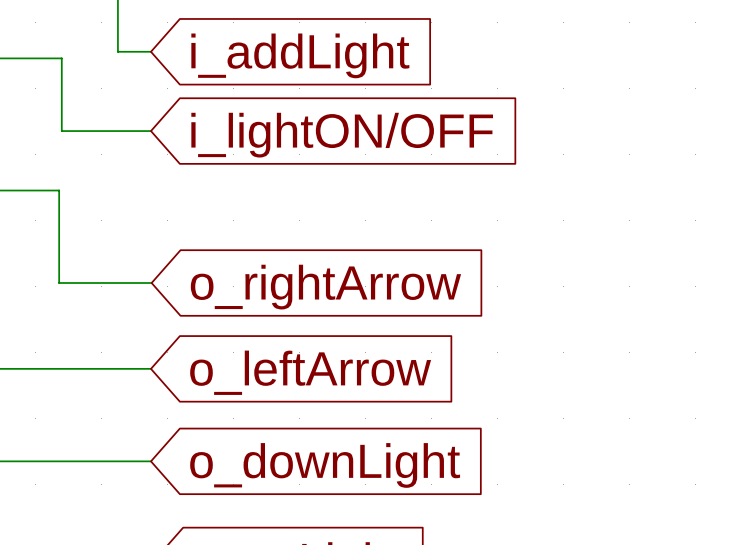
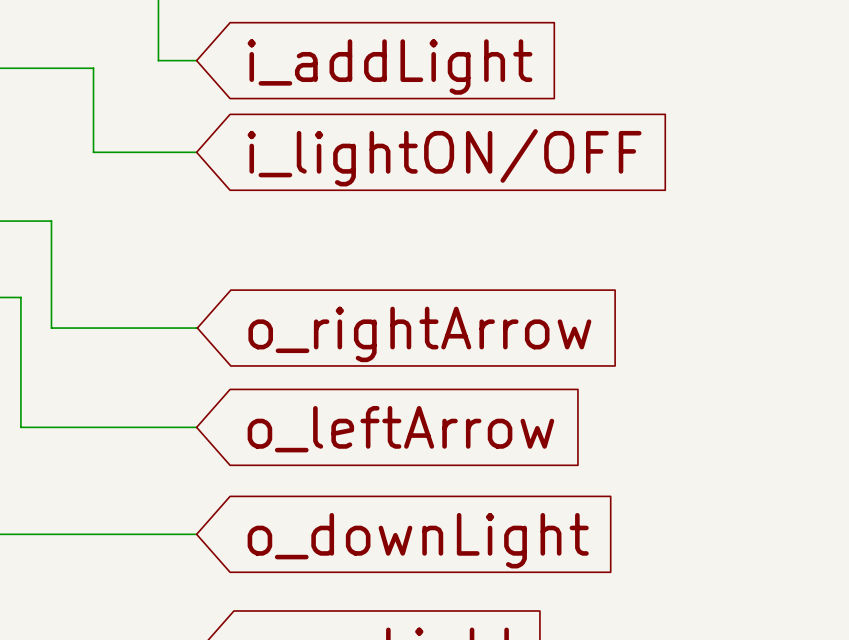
wire: (25, 190) (59, 190) (59, 283) -> (51, 221) (51, 328) (90, 328)

